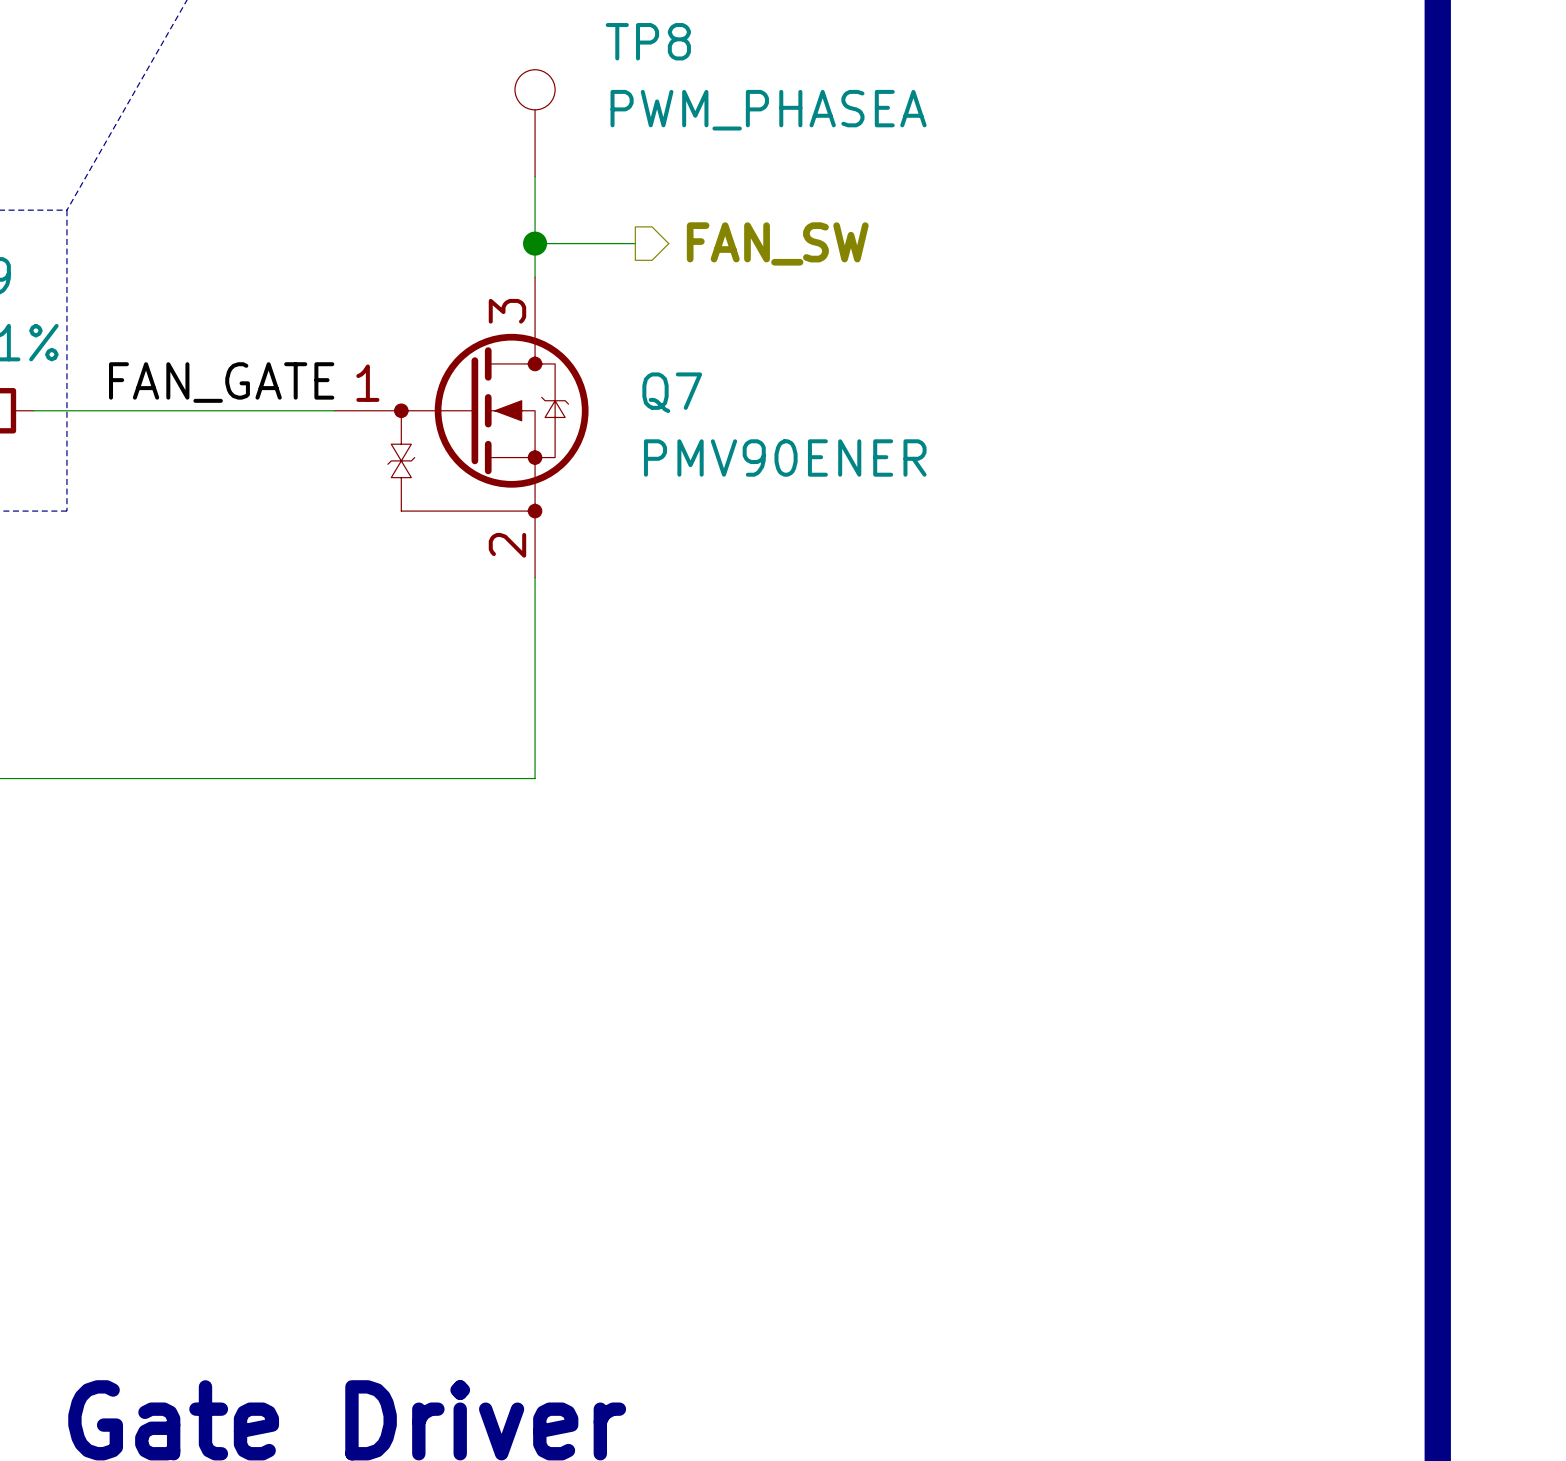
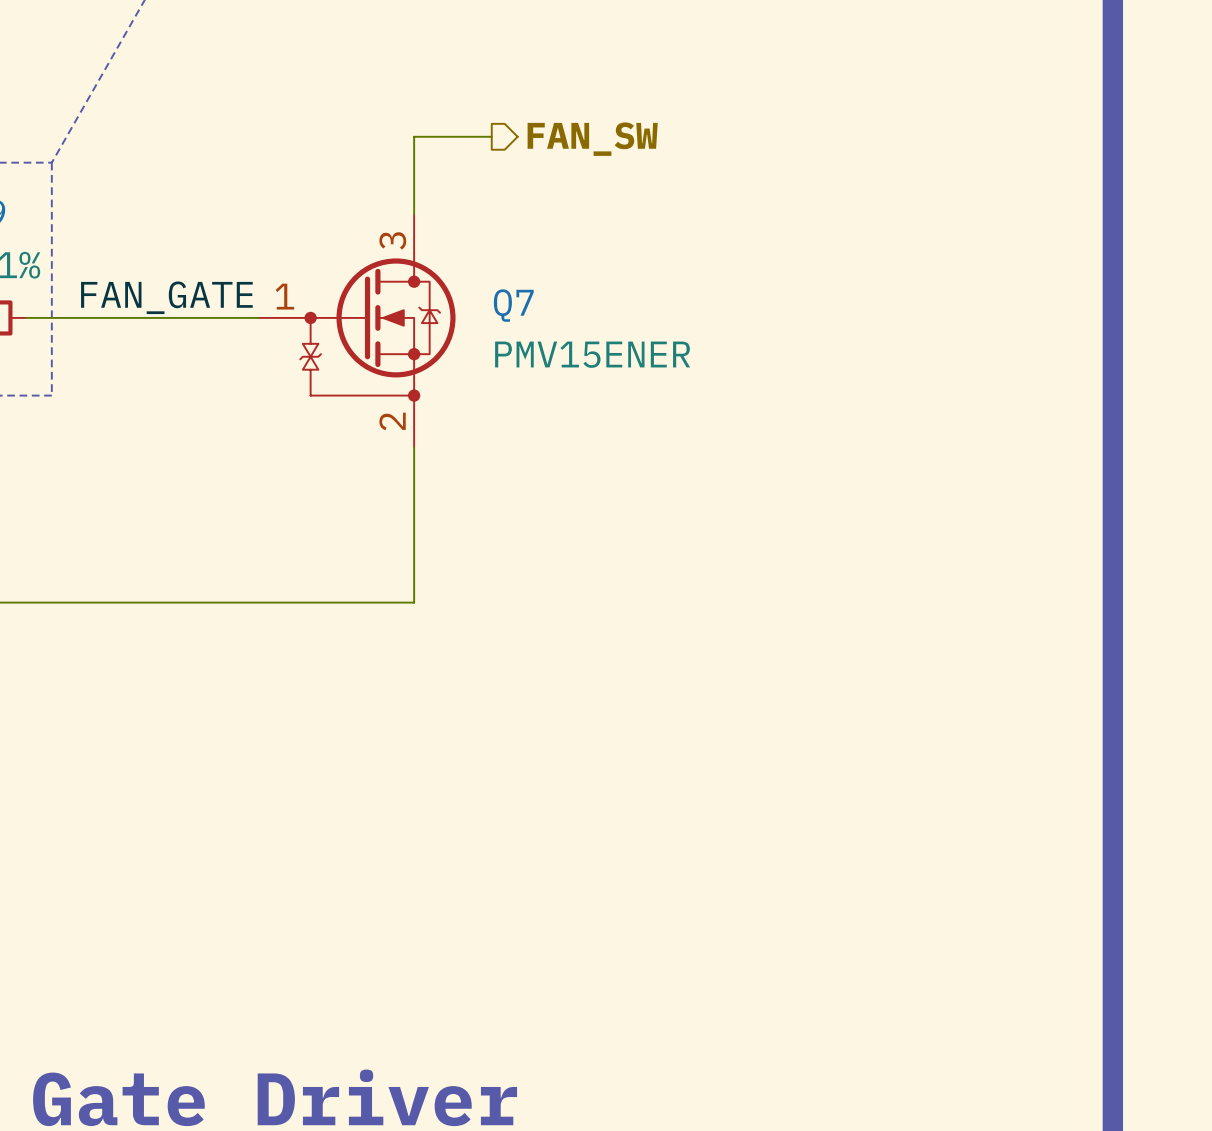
TP8: PWM_PHASEA (535, 123) -> none
wire: (535, 243) (635, 243) -> (414, 136) (491, 136)
junction: (535, 243) -> none
hierarchical label position: FAN_SW (777, 243) -> FAN_SW (592, 139)
Q7 value: PMV90ENER (785, 458) -> PMV15ENER (592, 354)

